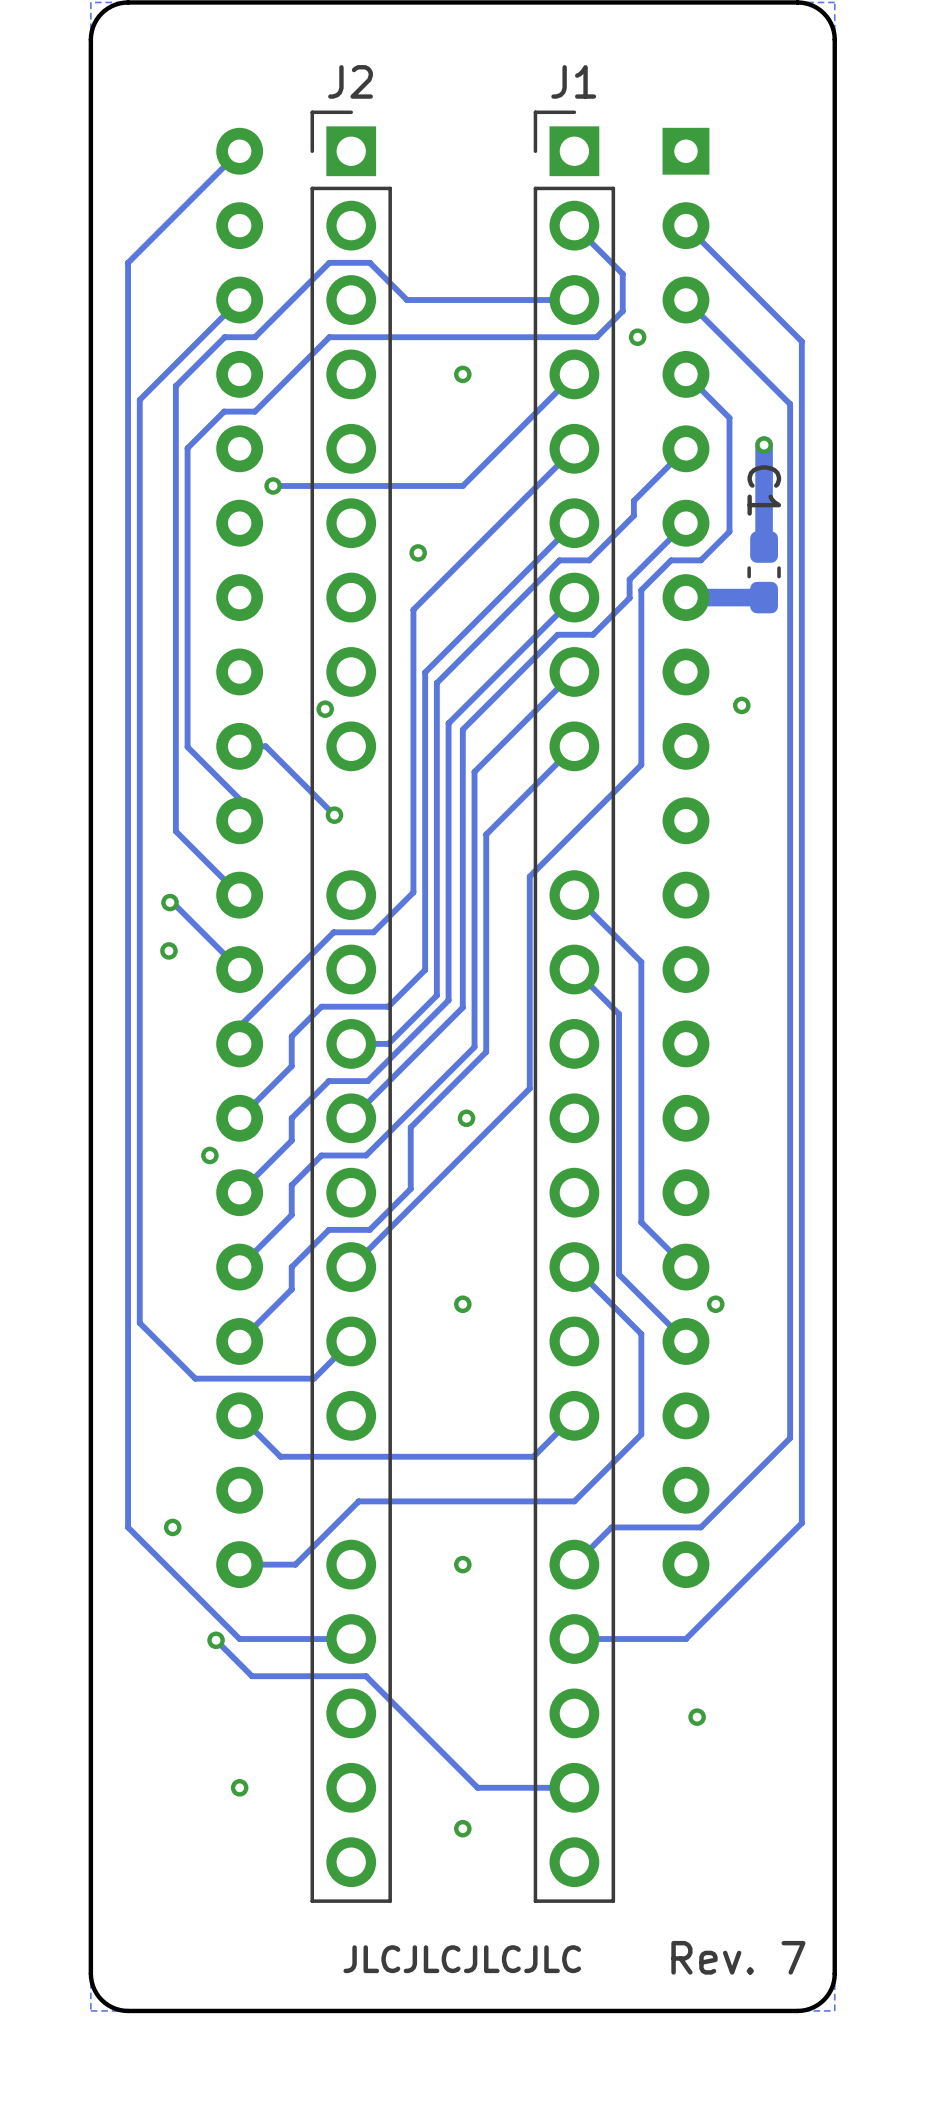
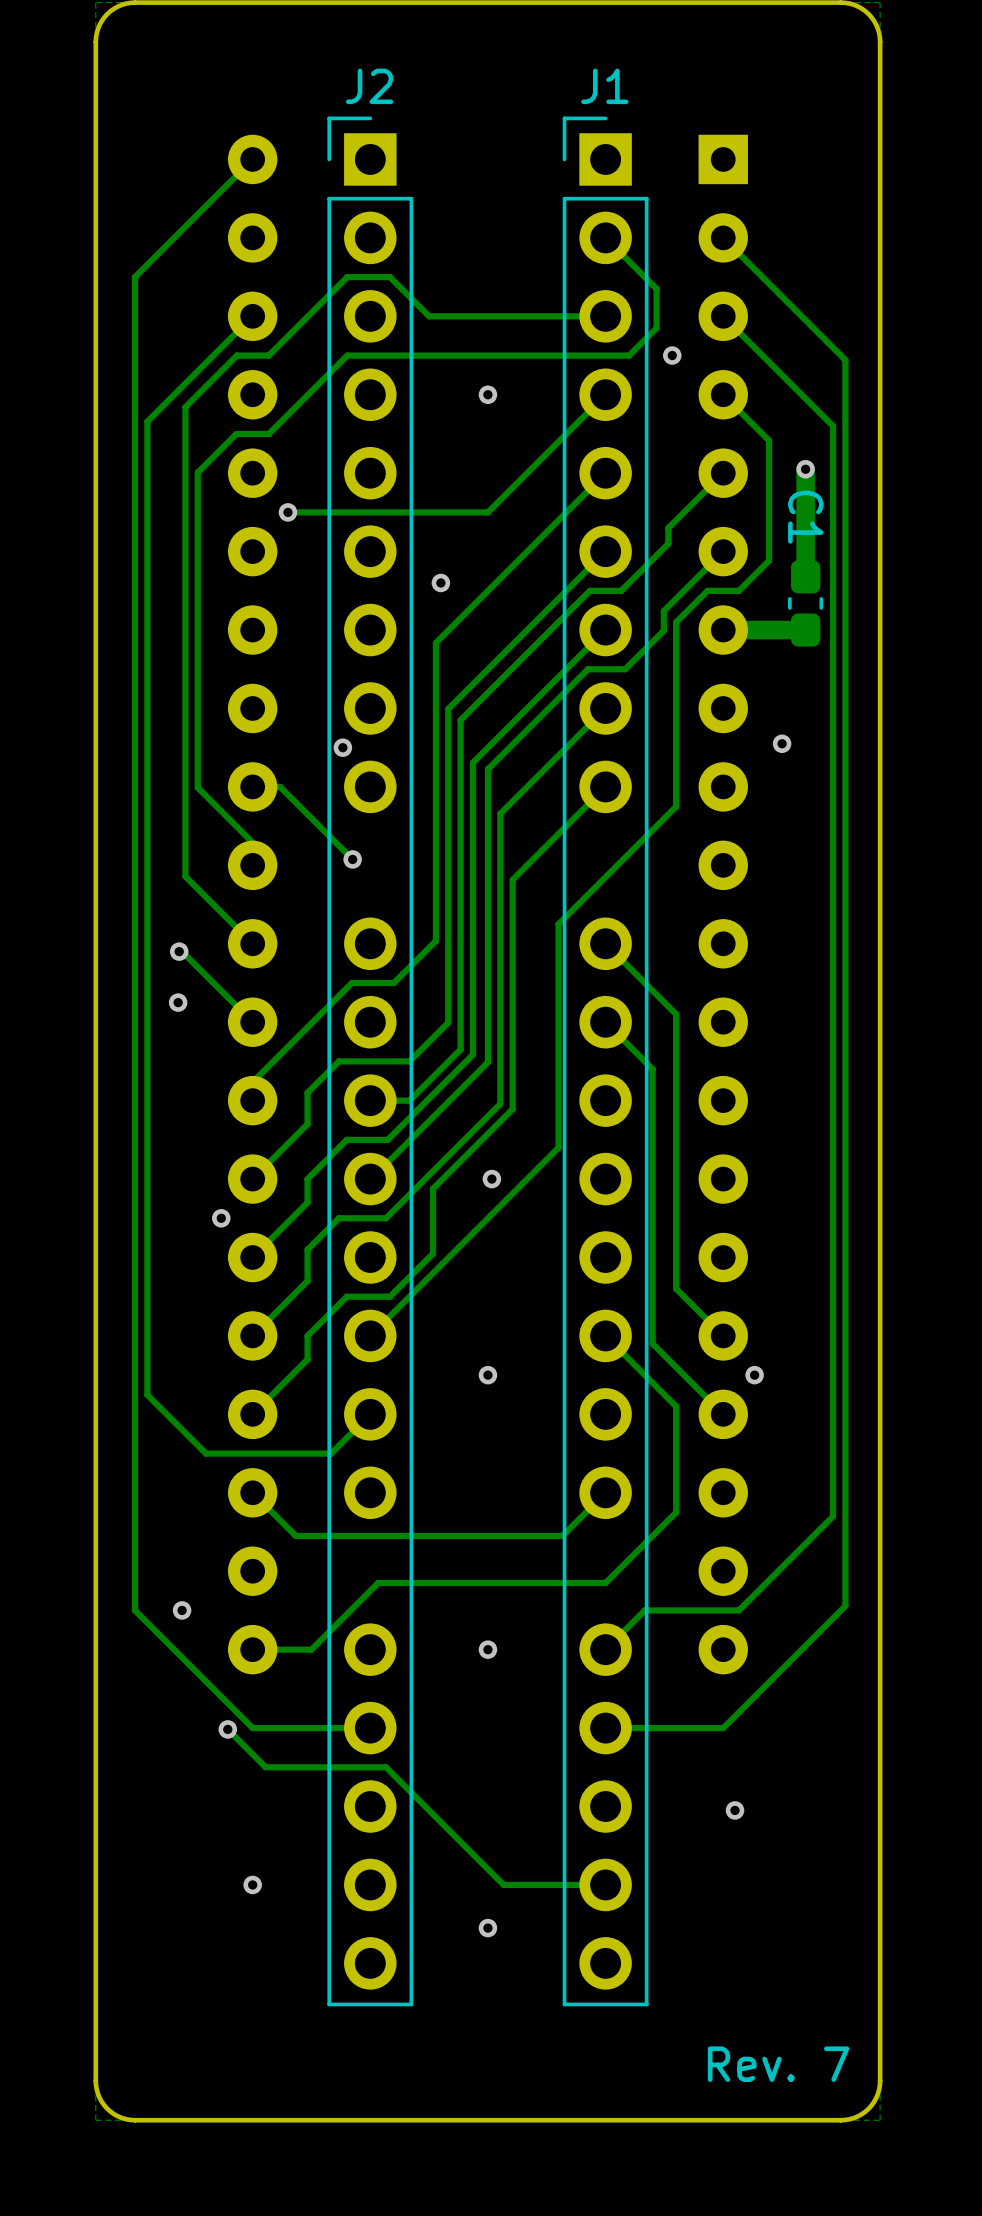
text: JLCJLCJLCJLC (462, 1959) -> none

